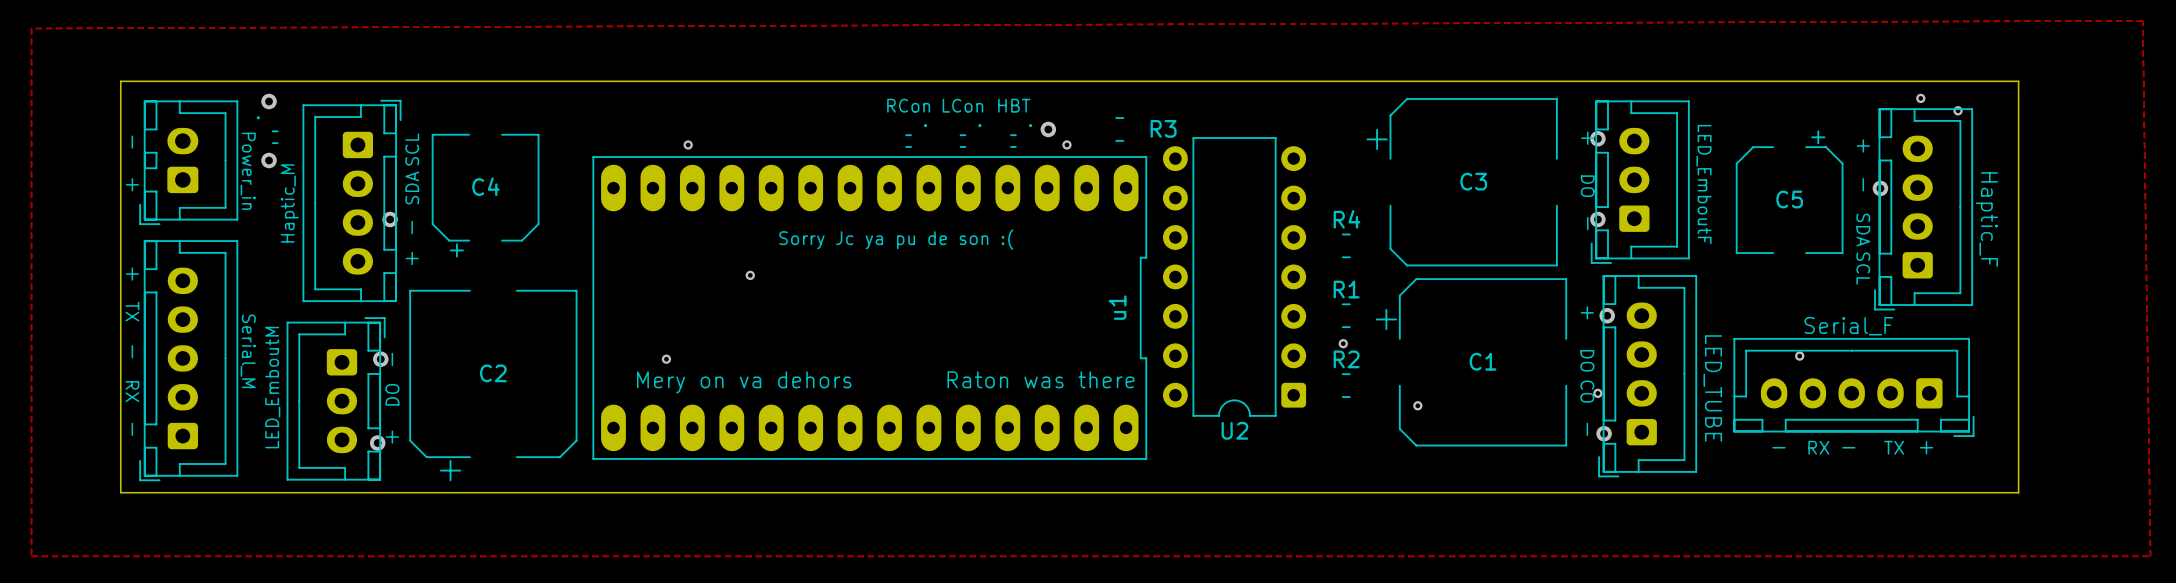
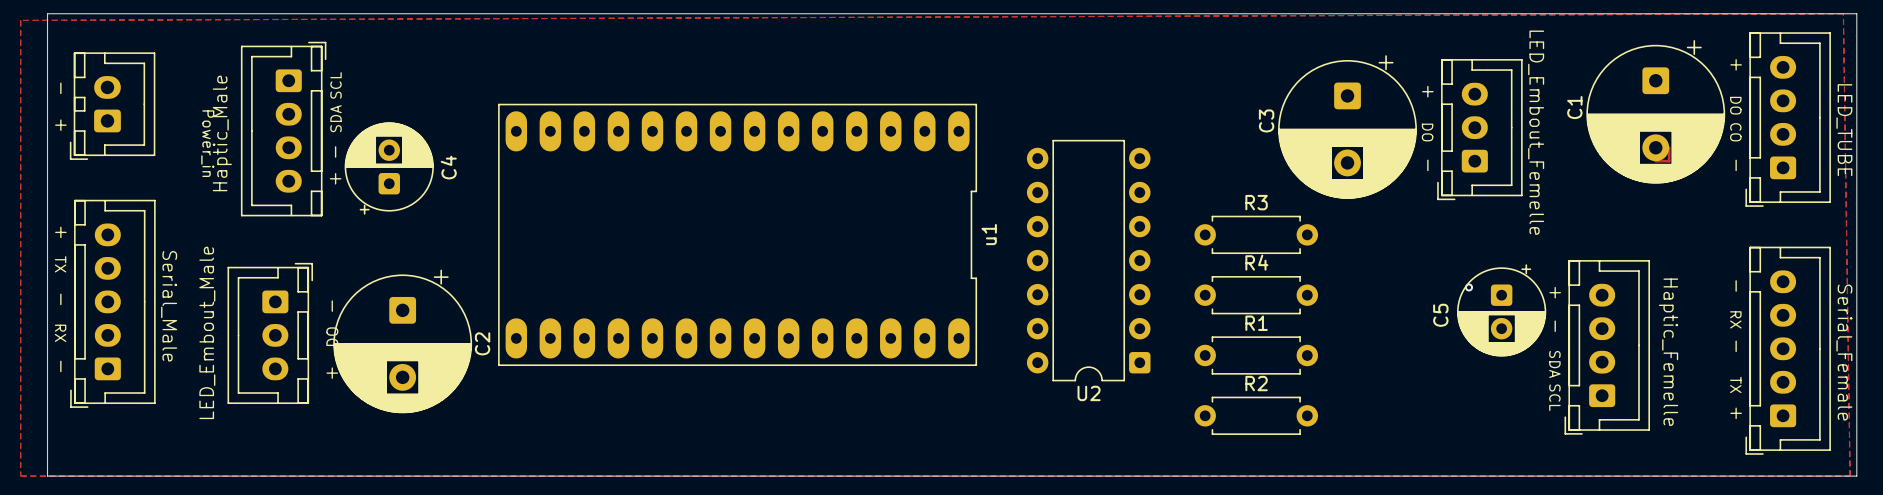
text: none -> + (1736, 64)
board edge: (120, 81) (2018, 81) (2018, 492) (120, 492) (120, 81) -> (47, 13) (47, 476) (1856, 476) (1856, 13) (47, 13)
C3 footprint: [1366, 98, 1558, 267] -> [1278, 55, 1417, 199]
via: (1920, 98) -> none
via: (269, 101) -> none
via: (1958, 110) -> none
part: (258, 117) -> none
R3 footprint: [1115, 117, 1125, 142] -> [1194, 215, 1319, 255]
RCon: (925, 125) -> none
LCon: (979, 125) -> none
HBT: (1030, 125) -> none
text: none -> DO (1735, 105)
R3 name position: R3 (1163, 128) -> R3 (1256, 202)
via: (1048, 129) -> none
C5 footprint: [1735, 130, 1844, 254] -> [1457, 264, 1547, 357]
C4 footprint: [431, 133, 540, 258] -> [344, 122, 434, 215]
part: (275, 137) -> none
text position: + (1587, 138) -> + (1427, 91)
via: (1597, 138) -> none
part: (908, 141) -> none
part: (962, 141) -> none
part: (1013, 141) -> none
text position: - (132, 142) -> - (60, 88)
part: none -> (1788, 119)
via: (688, 144) -> none
via: (1066, 144) -> none
text: + (1863, 145) -> none
text: none -> + (60, 125)
text position: SCL (412, 149) -> SCL (336, 85)
text: none -> LED_TUBE (1844, 130)
text: none -> LED_Embout_Femelle (1536, 132)
text: none -> CO (1735, 132)
via: (269, 160) -> none
part position: (188, 162) -> (112, 106)
track: none -> (1669, 147) (1669, 161) (1655, 161)
C3 name position: C3 (1473, 181) -> C3 (1266, 120)
part position: (1640, 182) -> (1479, 129)
text: + (132, 184) -> none
text: LED_EmboutF (1703, 184) -> none
text: - (1863, 184) -> none
C4 name position: C4 (485, 186) -> C4 (448, 167)
text position: DO (1587, 186) -> DO (1427, 132)
text position: SDA (412, 188) -> SDA (336, 118)
via: (1880, 188) -> none
text: none -> - (1736, 165)
C5 name position: C5 (1789, 199) -> C5 (1440, 315)
part position: (352, 200) -> (283, 129)
text: Haptic_M (289, 203) -> Haptic_Male (222, 133)
part: (1923, 209) -> none
via: (390, 219) -> none
via: (1597, 219) -> none
text: Haptic_F (1986, 219) -> none
text position: - (1587, 223) -> - (1427, 165)
text position: - (412, 227) -> - (335, 151)
text position: SDA (1863, 230) -> SDA (1554, 364)
R4 footprint: [1341, 233, 1351, 259] -> [1194, 276, 1319, 315]
text: Sorry Jc ya pu de son :( (896, 239) -> none
text position: + (412, 258) -> + (335, 178)
text position: SCL (1863, 268) -> SCL (1554, 397)
text: none -> + (60, 232)
text: + (132, 274) -> none
via: (750, 275) -> none
U2 position: (1234, 276) -> (1088, 260)
C1 footprint: [1375, 278, 1568, 447] -> [1586, 40, 1726, 184]
C2 footprint: [409, 289, 578, 482] -> [333, 269, 473, 414]
R1 footprint: [1341, 303, 1351, 329] -> [1194, 336, 1319, 375]
u1 position: (869, 307) -> (737, 234)
u1 name position: u1 (1117, 307) -> u1 (989, 234)
text position: TX (132, 311) -> TX (60, 264)
text: + (1587, 312) -> none
via: (1607, 315) -> none
text: Serial_F (1848, 326) -> none
text: none -> - (1736, 286)
via: none -> (1469, 287)
via: (1343, 343) -> none
text: none -> + (1555, 292)
text: none -> - (60, 299)
text: - (132, 351) -> none
text: Serial_M (248, 351) -> none
via: (1799, 356) -> none
text: none -> Serial_Male (169, 306)
via: (380, 359) -> none
via: (666, 359) -> none
part position: (188, 360) -> (112, 303)
text: DO (1587, 360) -> none
C1 name position: C1 (1483, 361) -> C1 (1574, 107)
C2 name position: C2 (493, 373) -> C2 (482, 343)
R2 footprint: [1341, 373, 1351, 398] -> [1194, 396, 1319, 435]
part: (1647, 376) -> none
text: Raton was there (1041, 379) -> none
text: Mery on va dehors (744, 382) -> none
text: none -> - (1555, 326)
text: LED_EmboutM (272, 387) -> LED_Embout_Male (207, 332)
part rotation: 0° (1853, 387) -> 90° clockwise (1788, 350)
part position: (1853, 387) -> (1788, 350)
text: LED_TUBE (1712, 388) -> none
text position: RX (132, 391) -> RX (60, 333)
text: CO (1587, 391) -> none
via: (1597, 393) -> none
part position: (336, 398) -> (270, 333)
via: (1417, 405) -> none
text: none -> - (1736, 346)
part: none -> (1607, 347)
text: none -> Haptic_Femelle (1668, 352)
text: none -> Serial_Female (1844, 352)
text: none -> - (60, 366)
text: - (132, 429) -> none
text: - (1587, 429) -> none
via: (1604, 433) -> none
via: (377, 443) -> none
text: - (1778, 447) -> none
text rotation: 0° (1818, 447) -> 90° clockwise (1735, 319)
text position: RX (1818, 447) -> RX (1735, 319)
text: - (1848, 447) -> none
text rotation: 0° (1894, 447) -> 90° clockwise (1735, 384)
text position: TX (1894, 447) -> TX (1735, 384)
text: + (1926, 447) -> none
text: none -> + (1736, 413)

